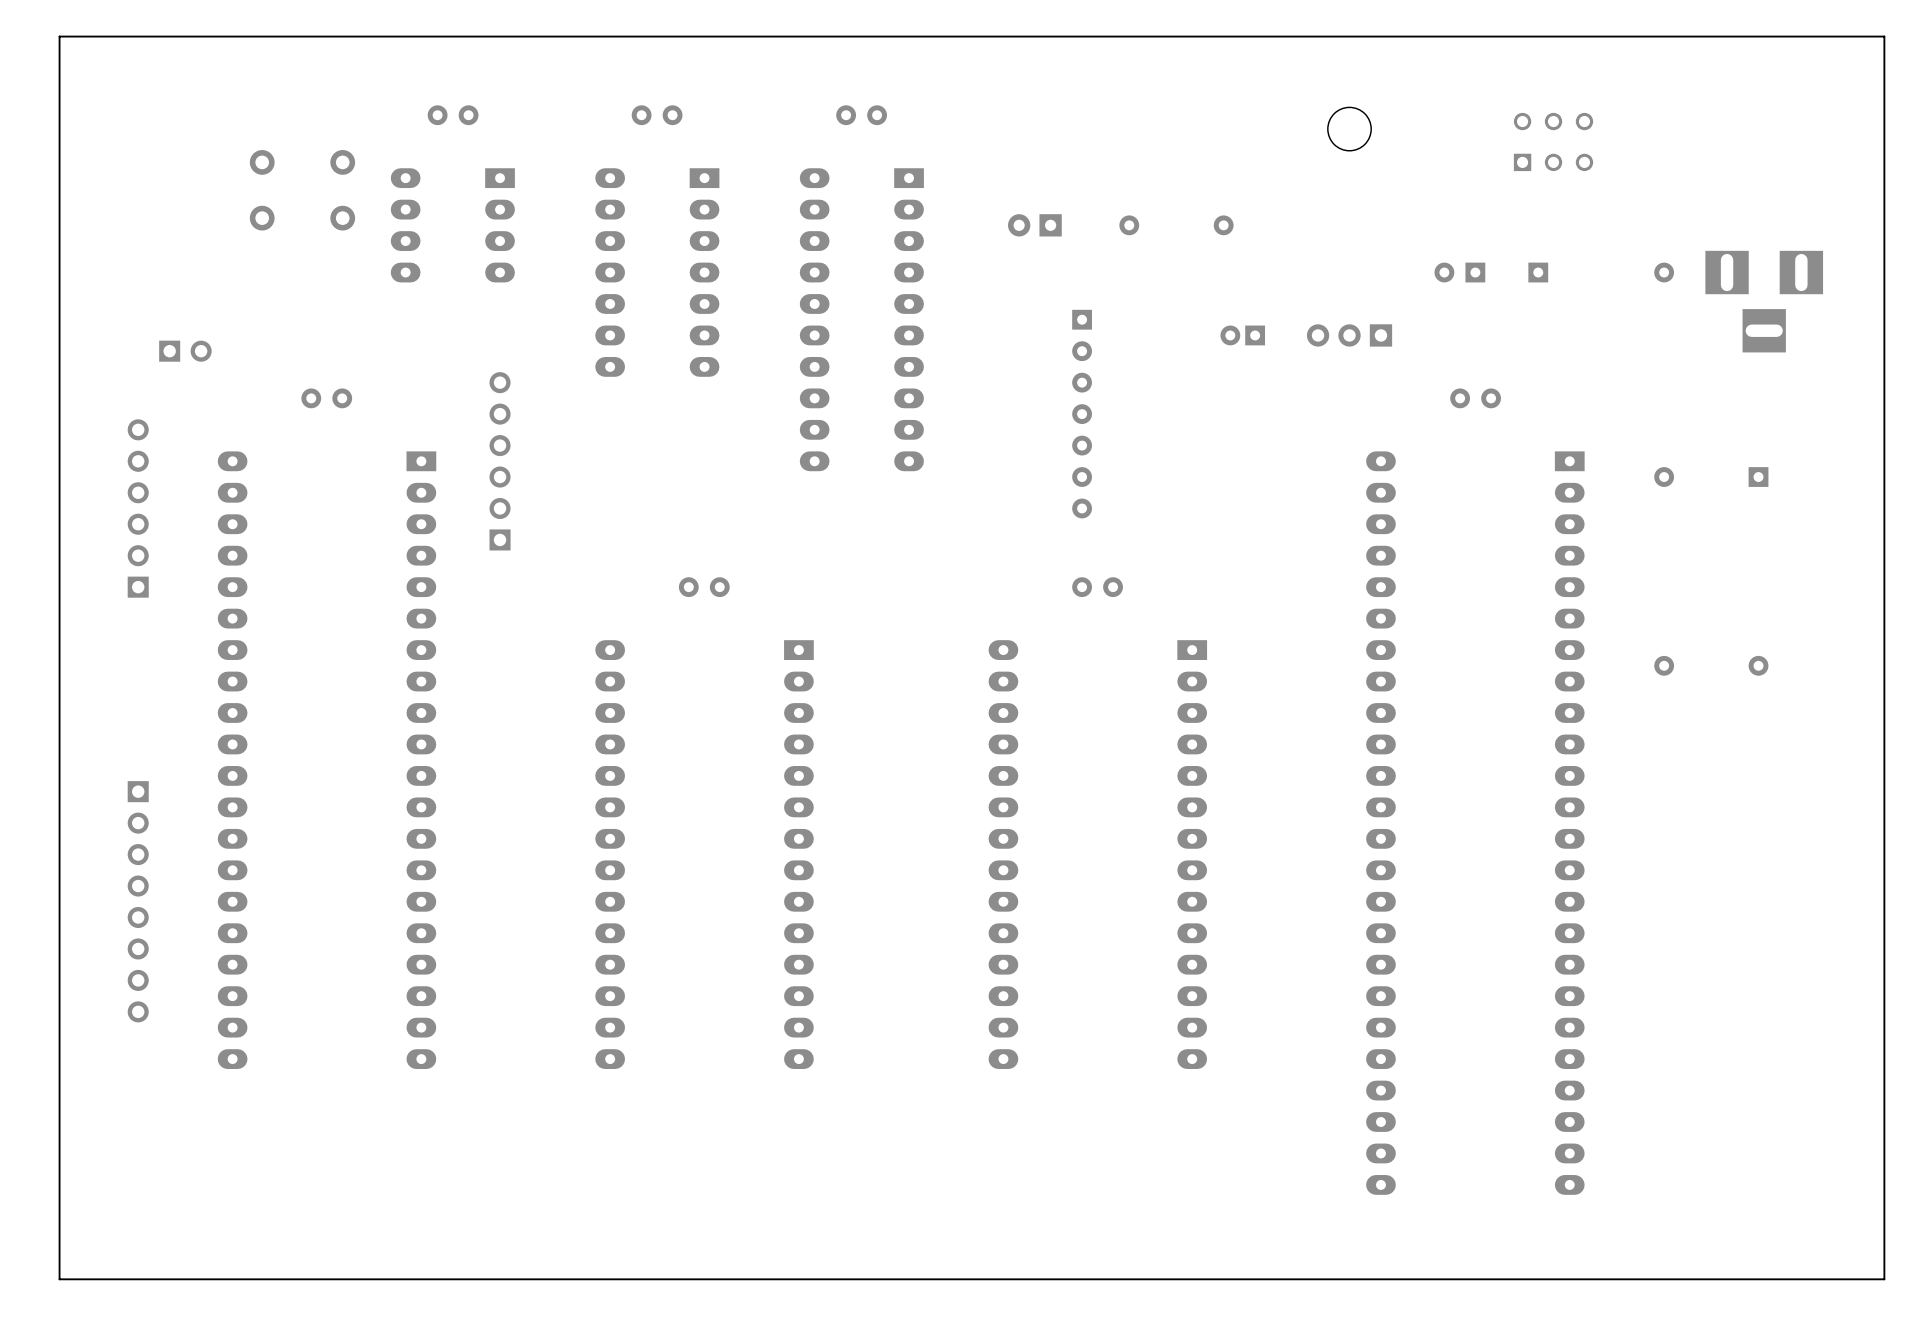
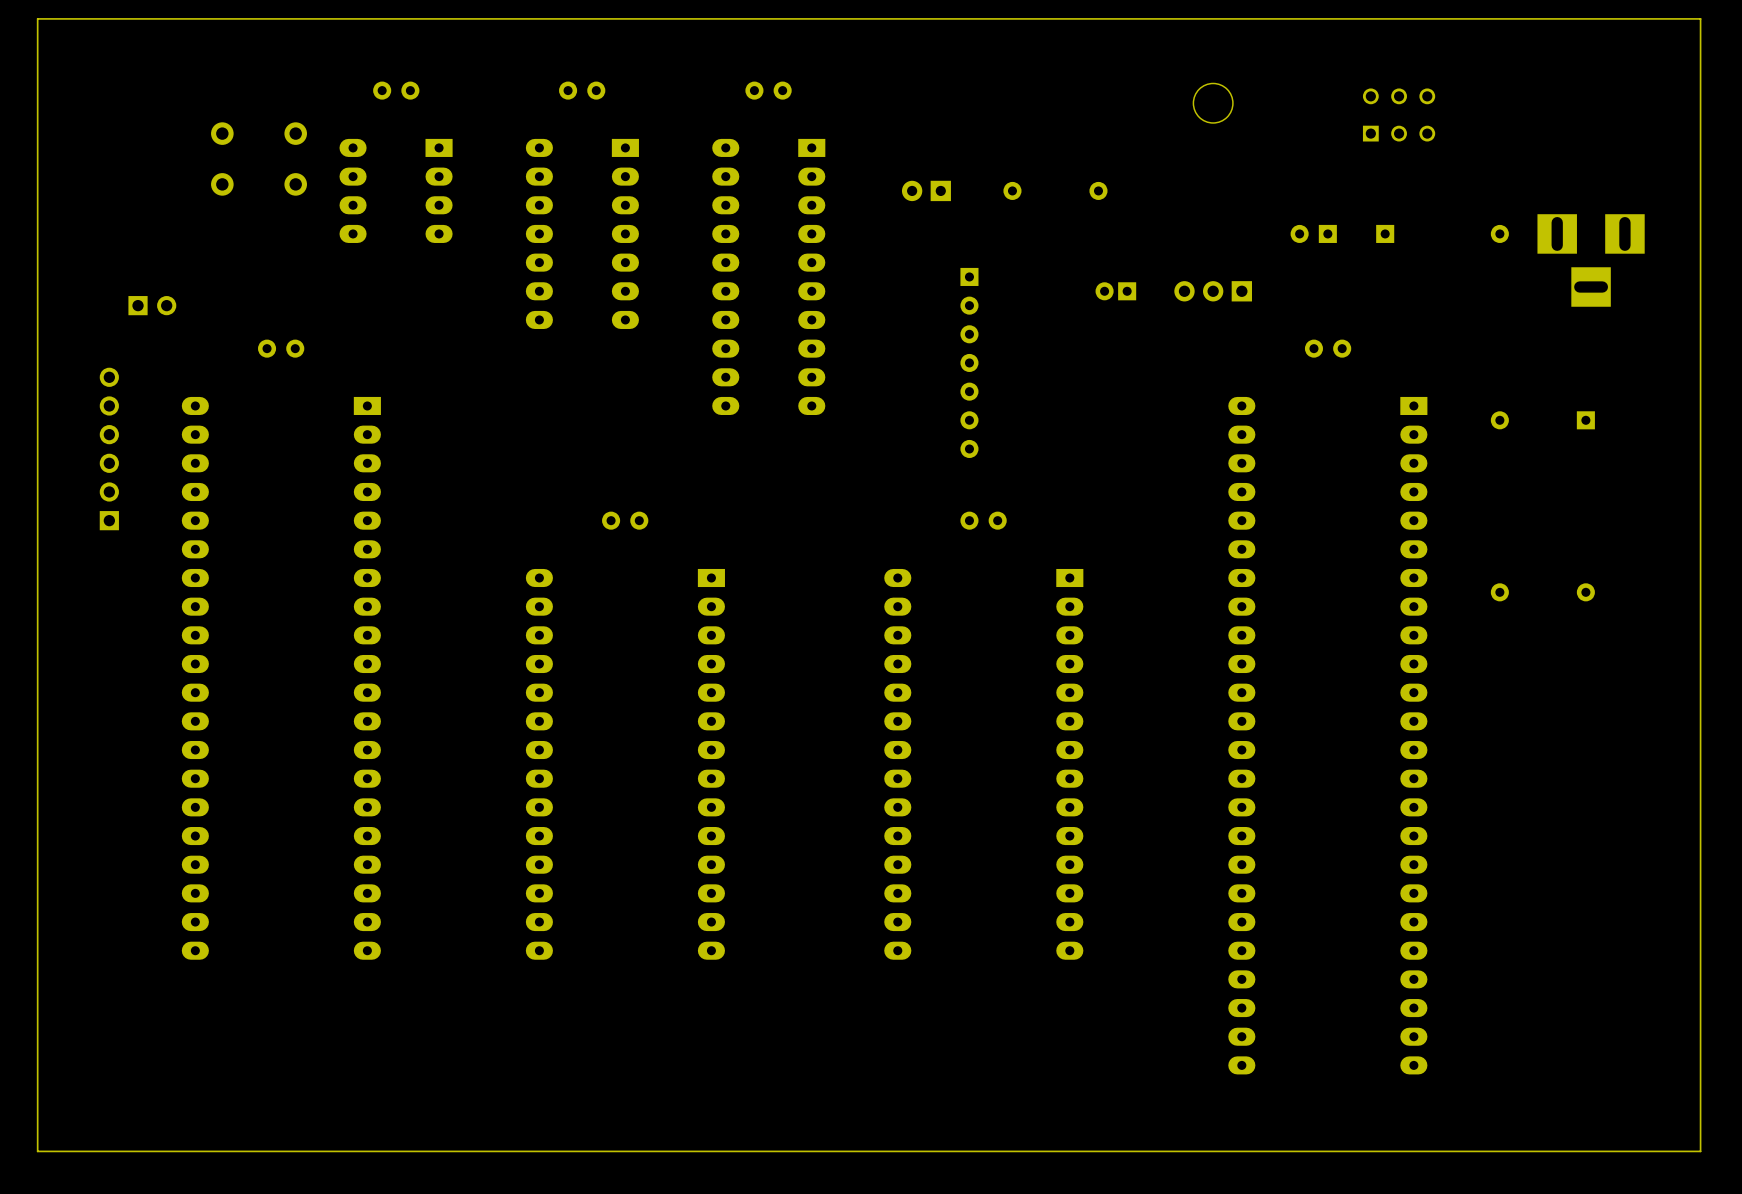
part: (500, 461) -> none
part: (138, 901) -> none

